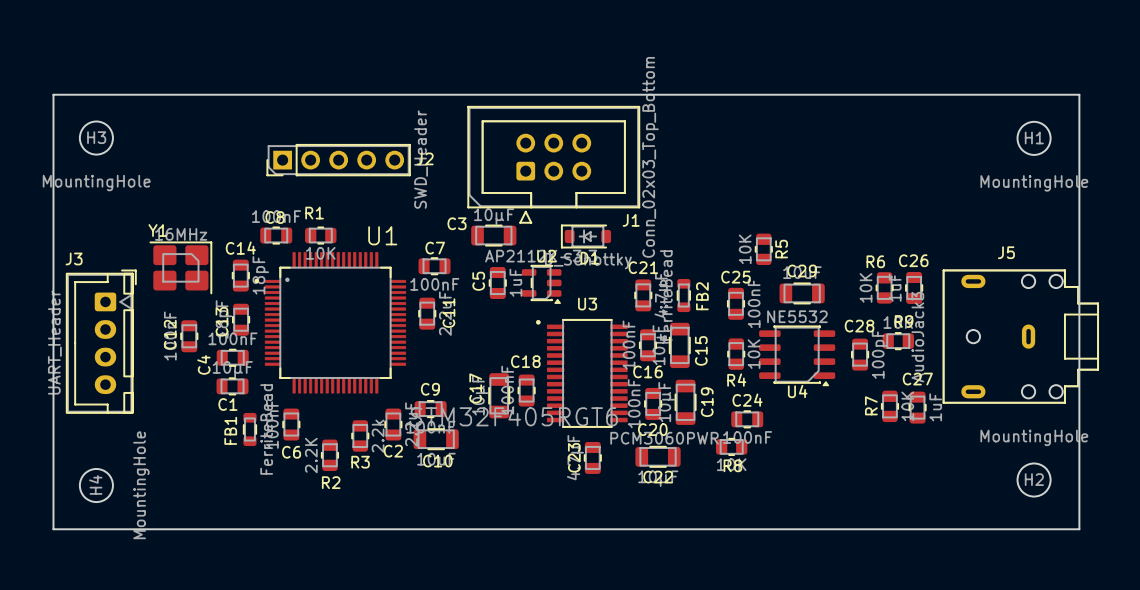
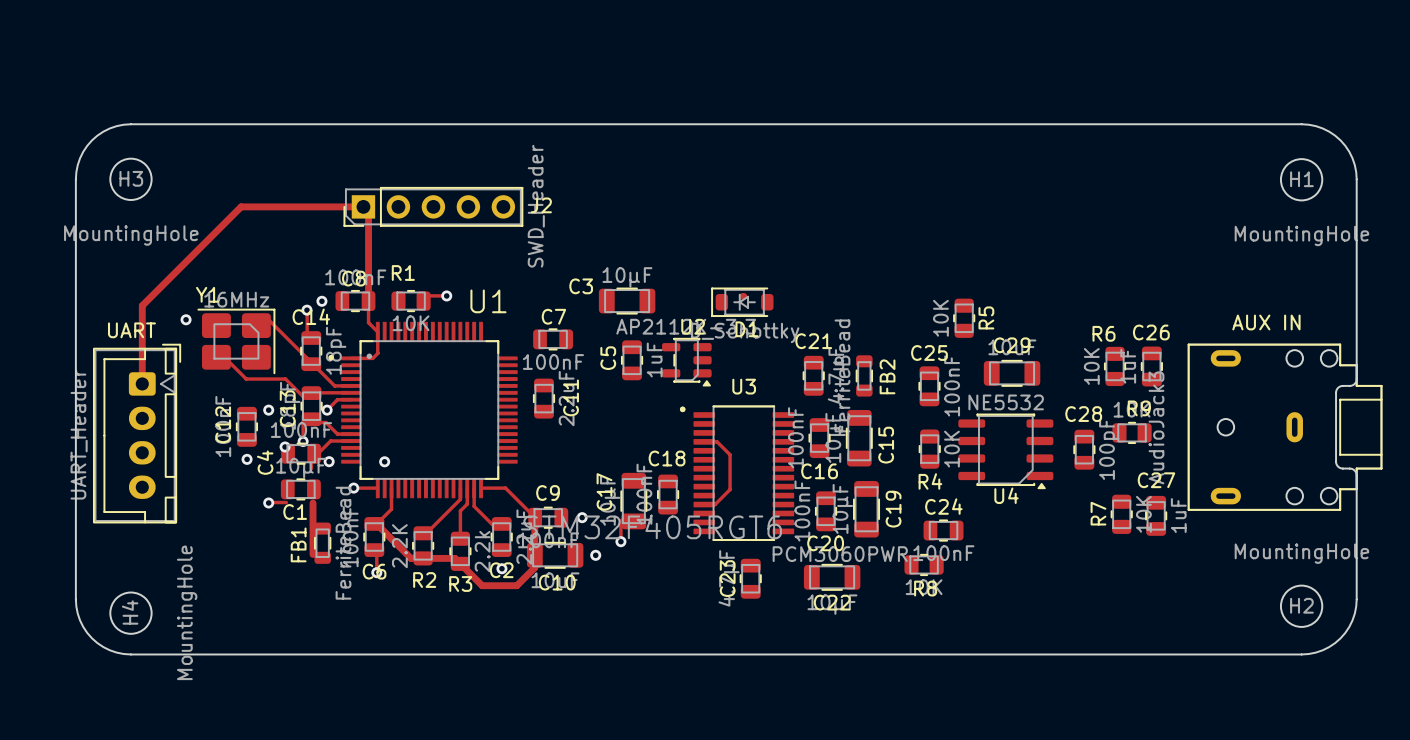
board edge: (53, 94) (1079, 94) (1079, 529) (53, 529) (53, 94) -> (130, 124) (109, 128) (92, 140) (80, 158) (75, 179) (76, 606) (80, 620) (87, 632) (97, 643) (109, 650) (130, 654) (1301, 654) (1322, 650) (1335, 643) (1345, 632) (1352, 620) (1356, 599) (1356, 474) (1353, 469) (1340, 468) (1336, 463) (1336, 392) (1339, 386) (1352, 385) (1356, 379) (1356, 179) (1352, 158) (1345, 145) (1335, 135) (1322, 128) (1301, 124) (130, 124)
J1: Conn_02x03_Top_Bottom (553, 164) -> none
track: none -> (424, 295) (446, 295)
via: none -> (446, 295)
track: none -> (742, 296) (743, 296)
via: none -> (321, 301)
track: none -> (306, 310) (307, 332)
via: none -> (306, 310)
track: none -> (257, 318) (266, 318) (334, 385) (351, 385)
via: none -> (186, 319)
J5 name: J5 (1006, 252) -> AUX IN (1266, 322)
J3 name: J3 (74, 258) -> UART (131, 330)
track: none -> (217, 349) (246, 379) (285, 379) (302, 396) (306, 392) (345, 392)
track: none -> (377, 353) (377, 331) (368, 322) (368, 211) (363, 206) (241, 206) (142, 305) (142, 383)
track: none -> (377, 353) (372, 358) (351, 358)
track: none -> (351, 399) (337, 399) (327, 410)
via: none -> (268, 410)
via: none -> (327, 410)
track: none -> (351, 434) (337, 434) (325, 422) (302, 422) (303, 441)
track: none -> (351, 441) (330, 441) (311, 460) (311, 468)
via: none -> (303, 441)
track: none -> (704, 441) (717, 441) (730, 454) (730, 489) (715, 504) (704, 504)
via: none -> (285, 446)
via: none -> (247, 459)
via: none -> (329, 461)
via: none -> (384, 461)
track: none -> (353, 488) (377, 488)
via: none -> (353, 488)
track: none -> (391, 488) (391, 509) (376, 524) (411, 558) (454, 558) (482, 585) (516, 585) (534, 567) (535, 517) (505, 488) (481, 488)
track: none -> (460, 488) (460, 499) (426, 533) (423, 533)
track: none -> (467, 488) (467, 504) (460, 510) (460, 538)
track: none -> (474, 488) (474, 506) (491, 523) (501, 523)
track: none -> (286, 502) (268, 502)
via: none -> (268, 502)
track: none -> (313, 503) (313, 554)
via: none -> (582, 517)
track: none -> (621, 520) (620, 541)
via: none -> (620, 541)
track: none -> (376, 550) (376, 572)
via: none -> (595, 555)
via: none -> (501, 568)
via: none -> (376, 572)
R2 position: (329, 455) -> (423, 545)

